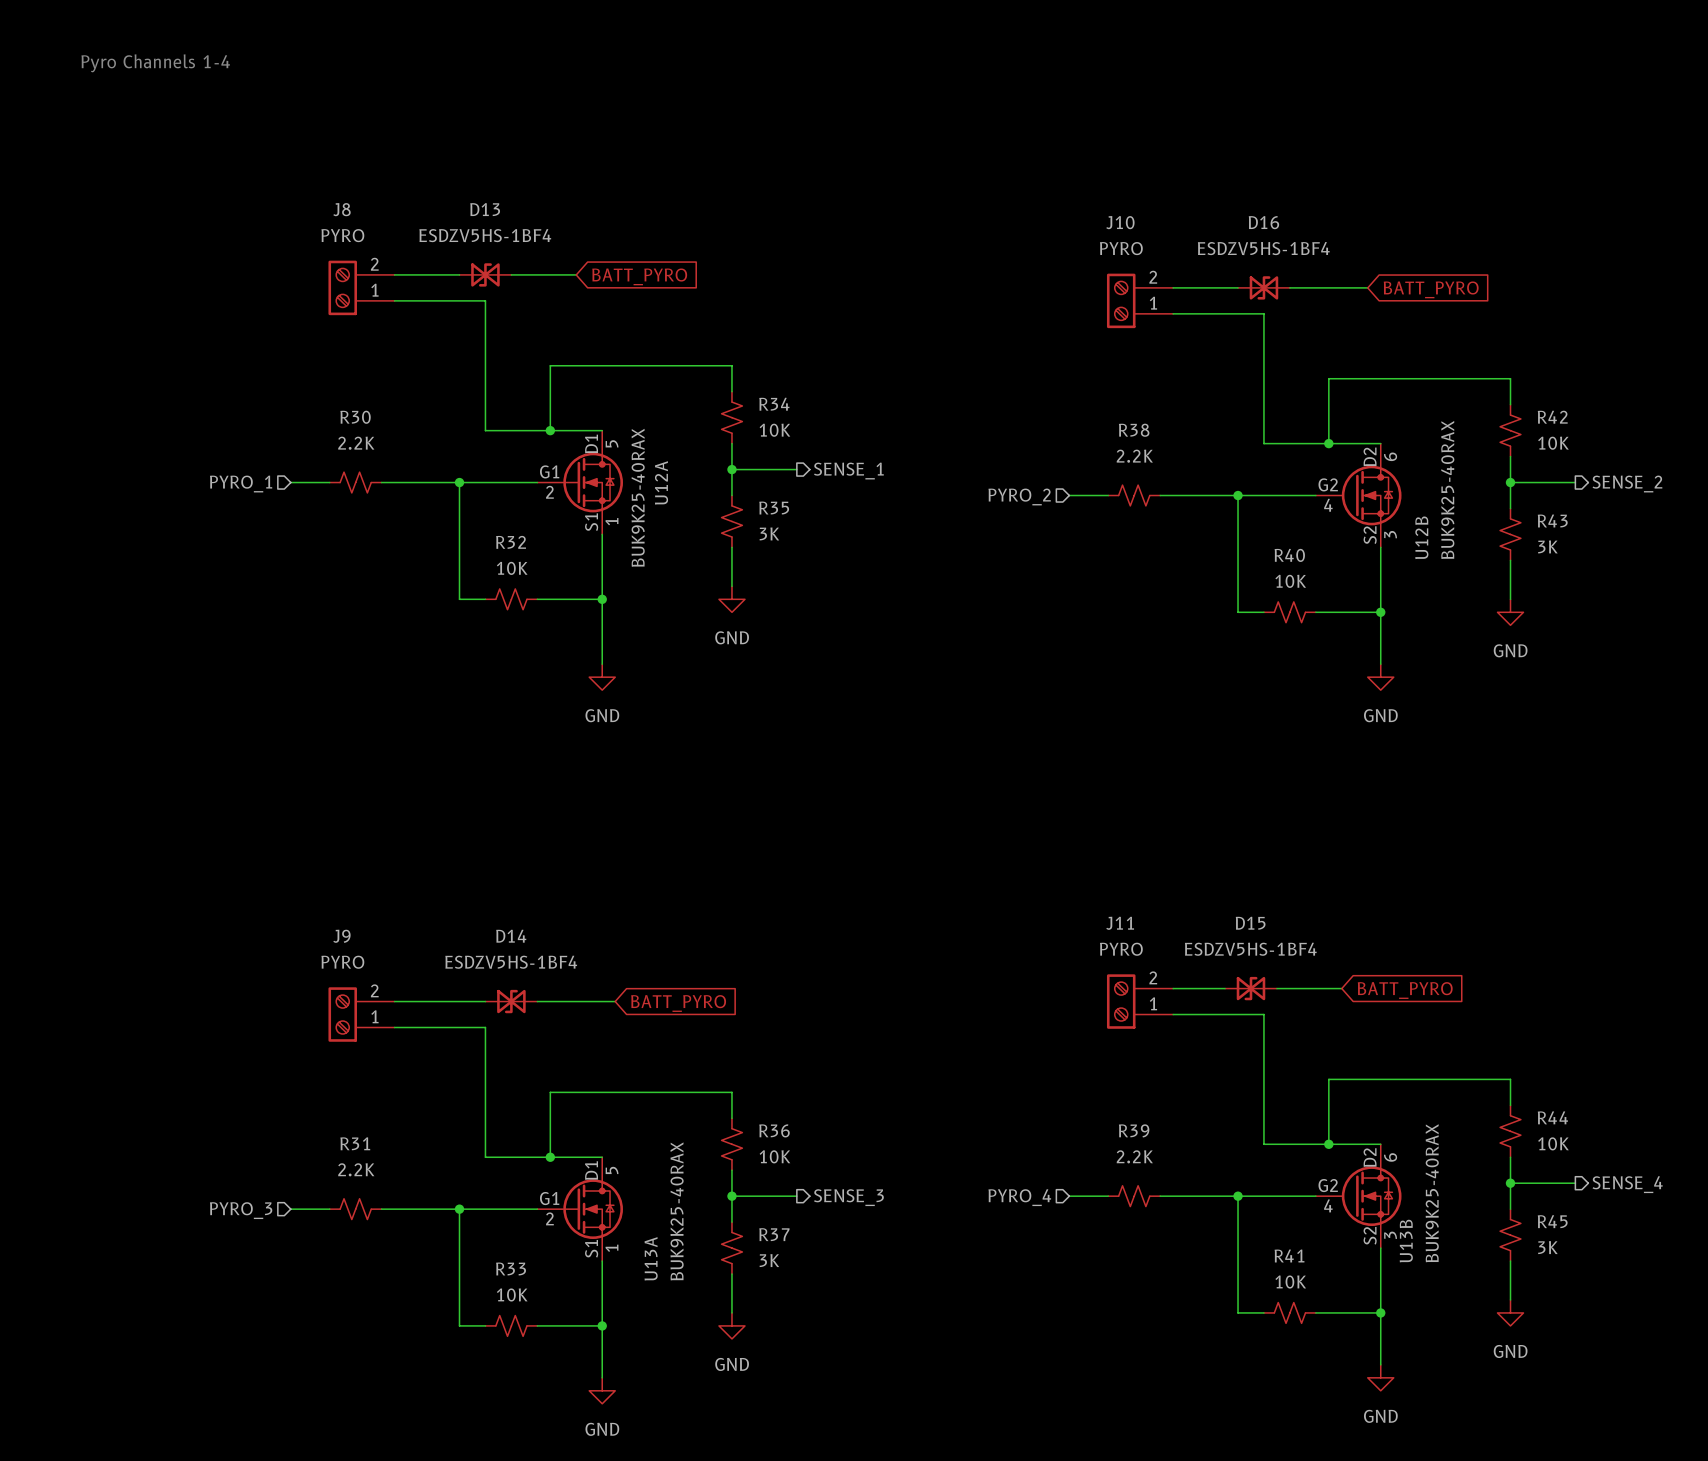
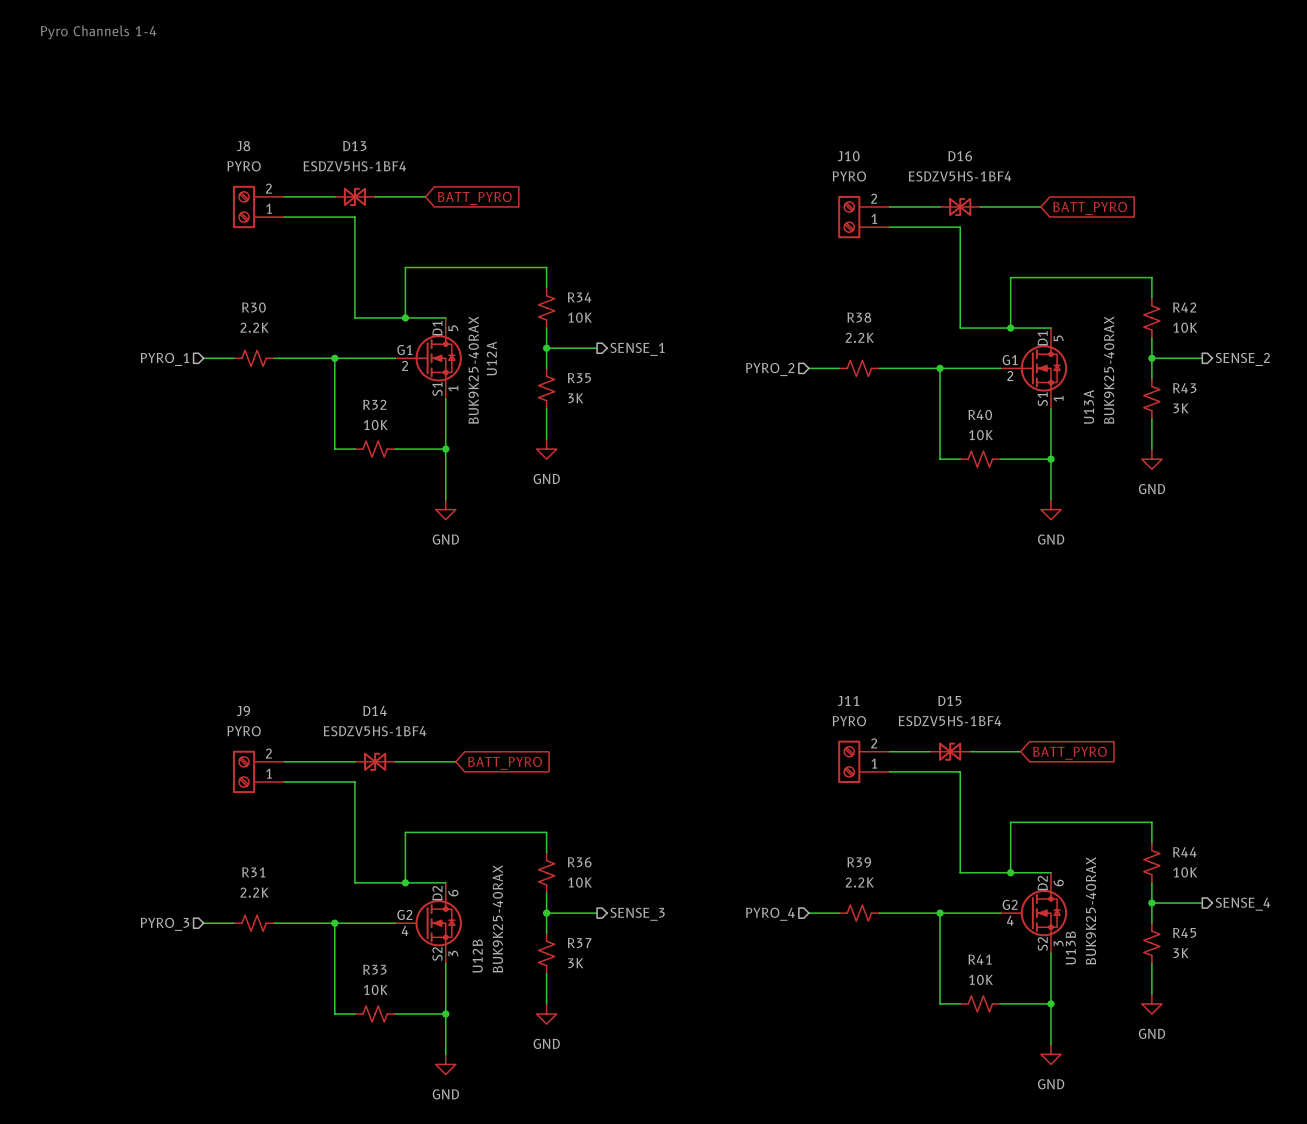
U12B position: (1358, 495) -> (428, 923)
U13A position: (580, 1209) -> (1033, 368)

